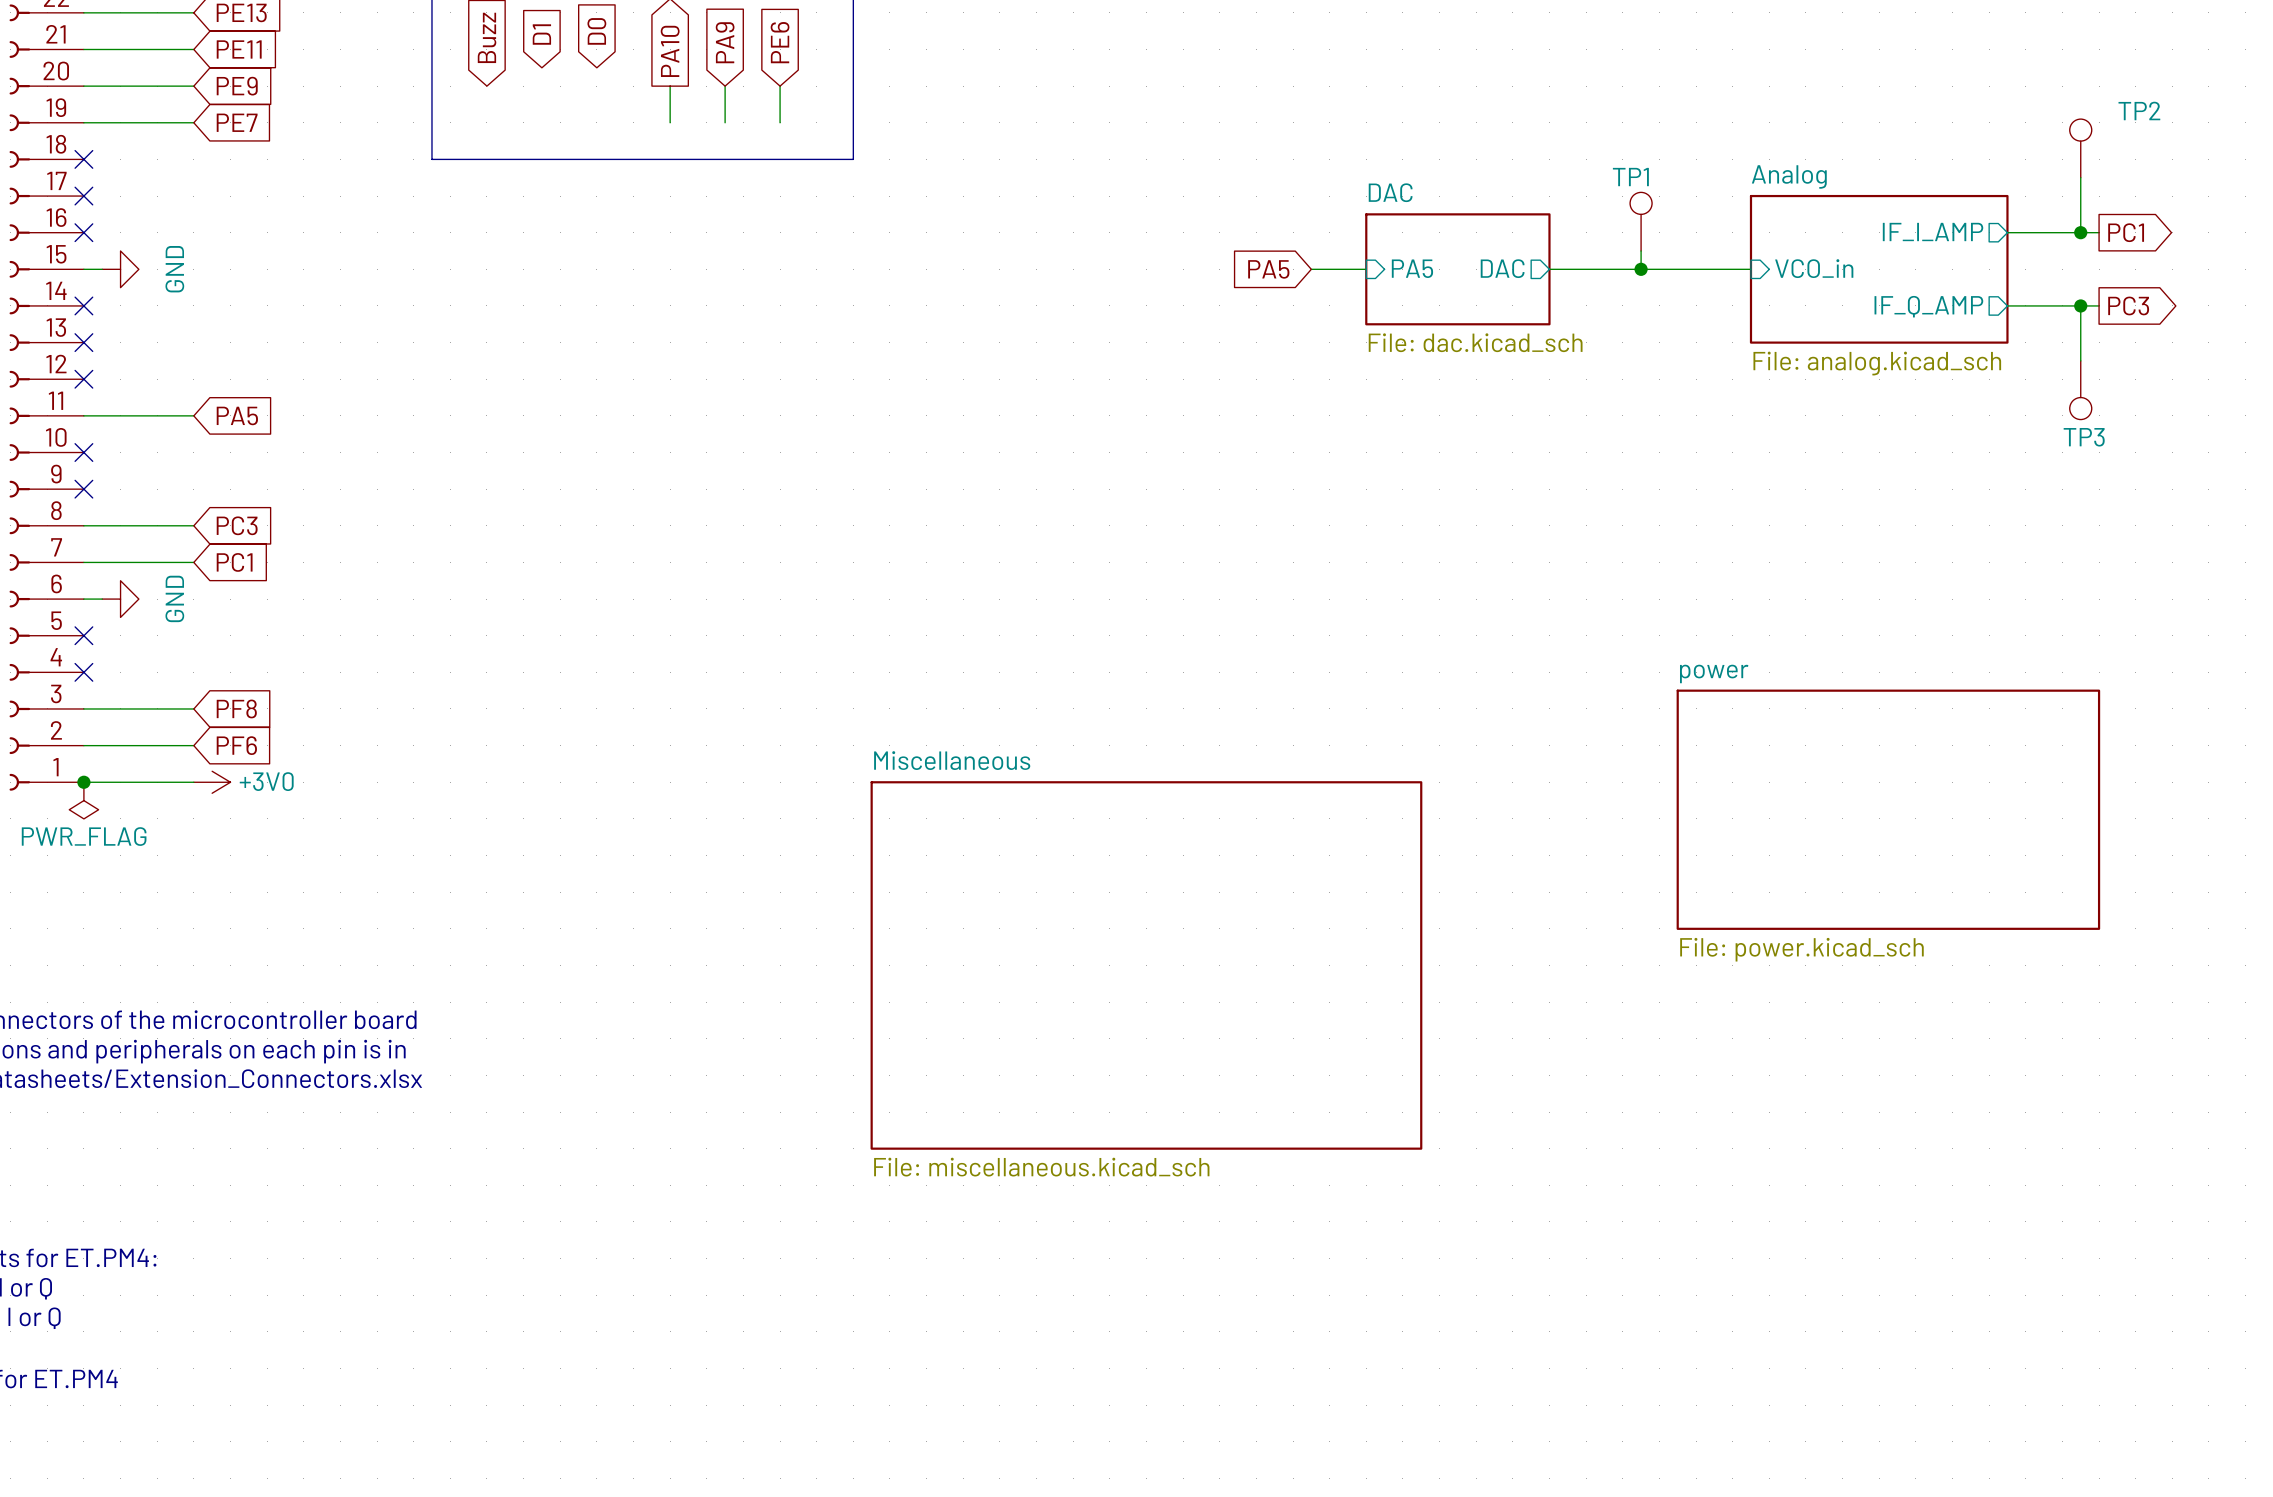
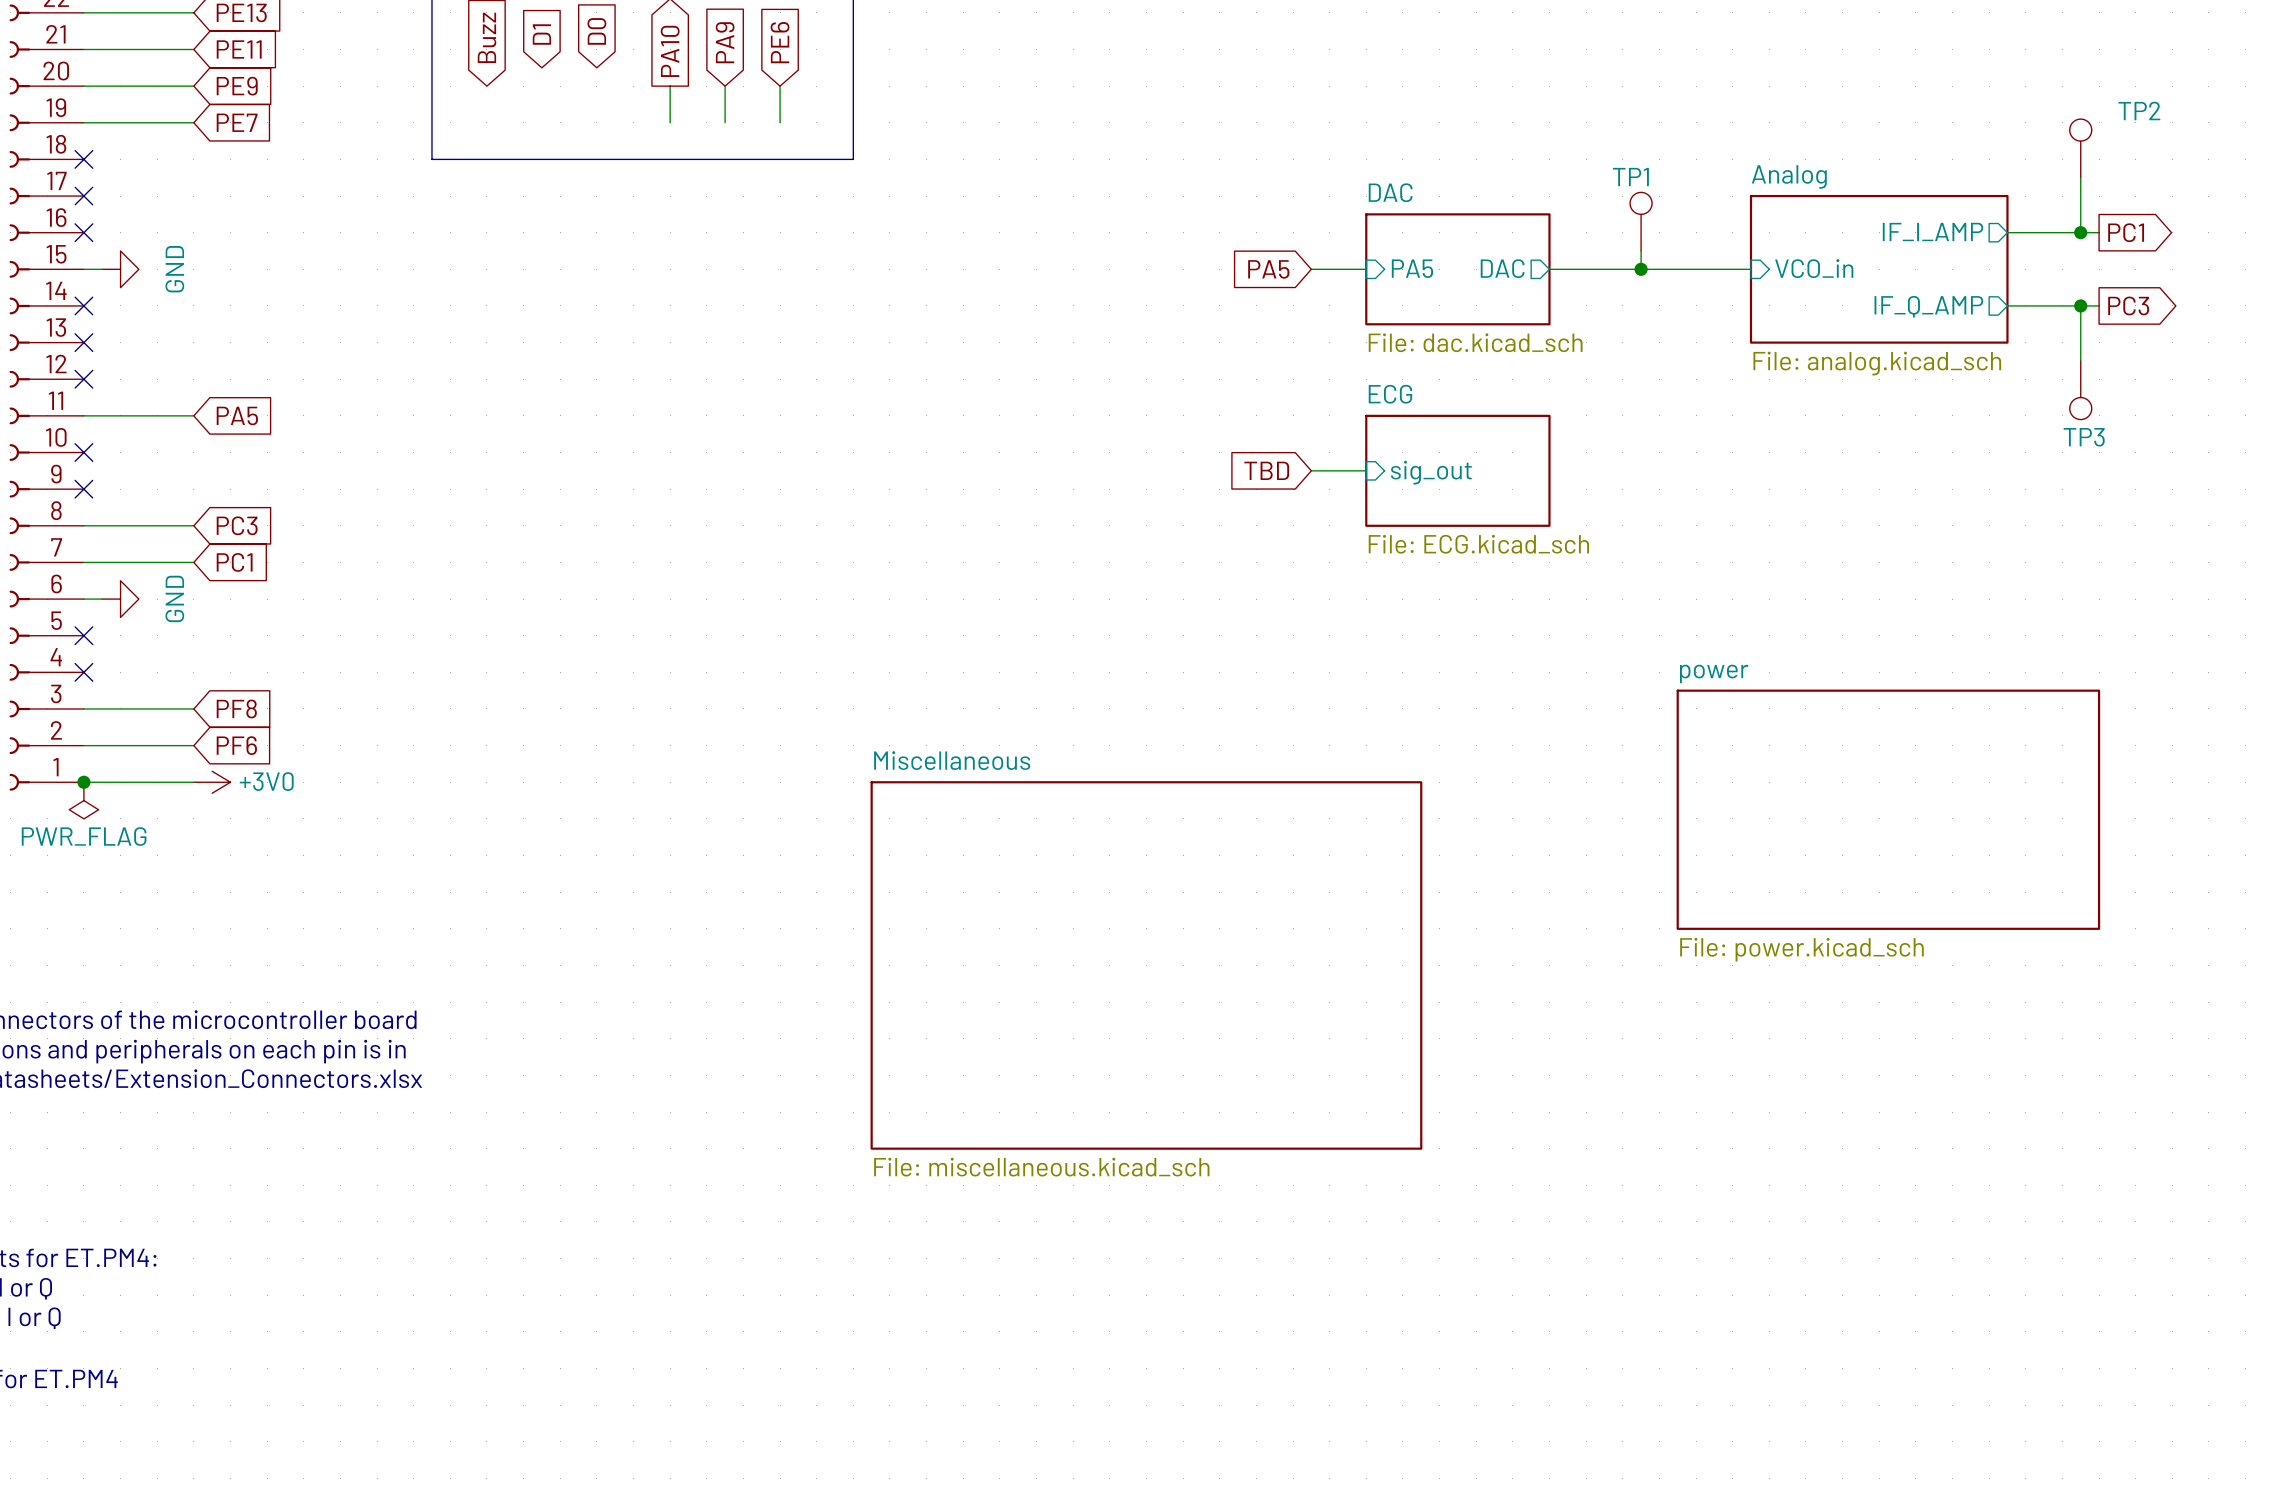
global label: none -> TBD (1266, 470)
wire: none -> (1311, 470) (1366, 470)
sheet ECG: none -> File: ECG.kicad_sch (1457, 470)
sheet pin: none -> sig_out (1431, 472)

